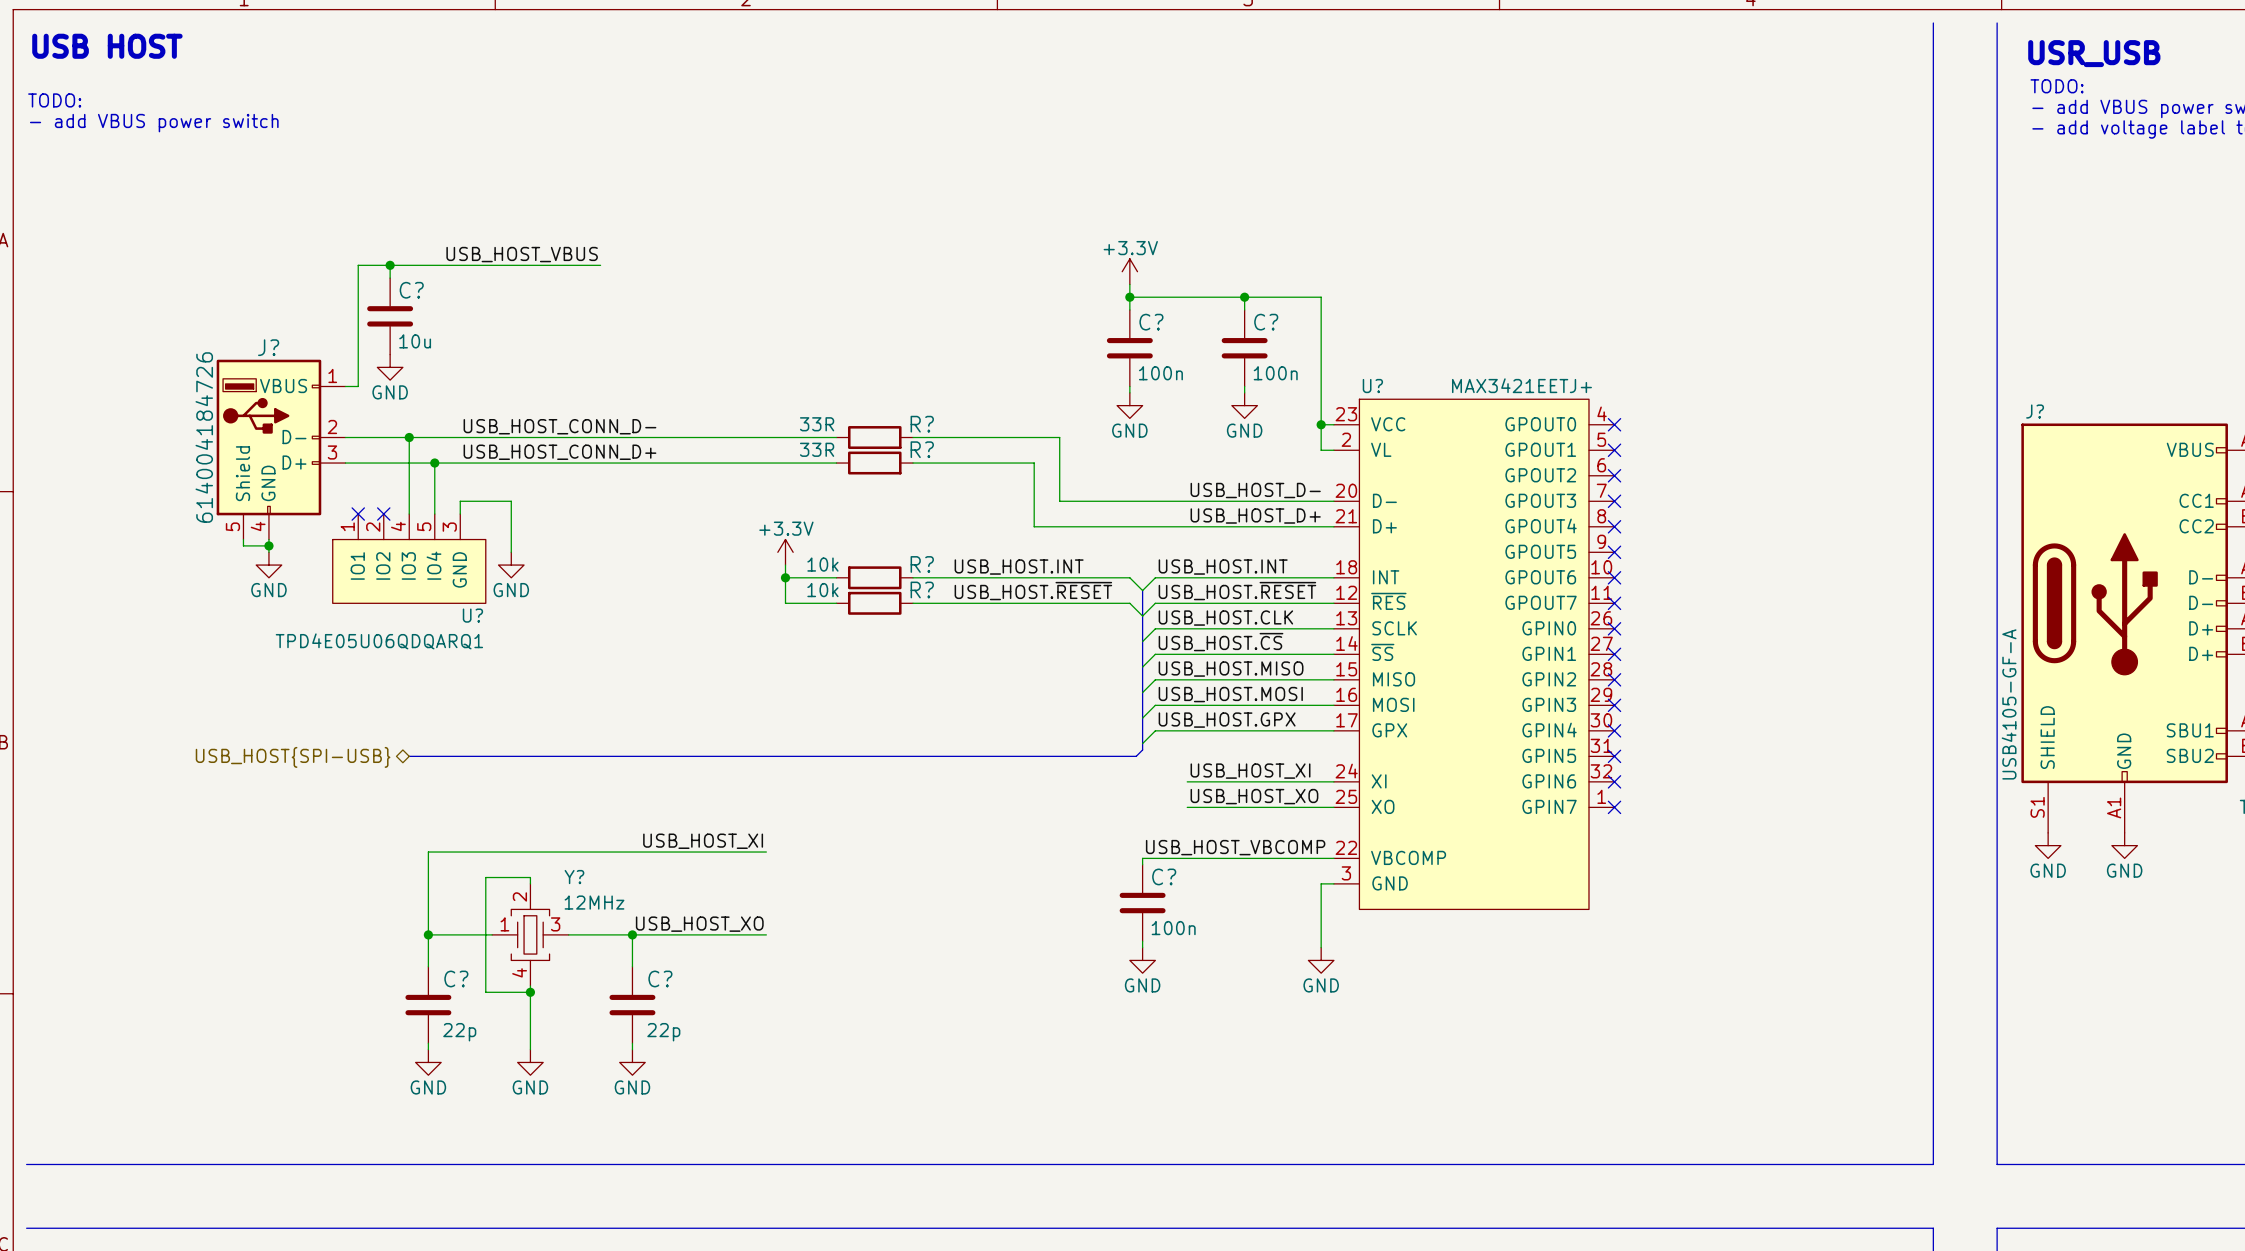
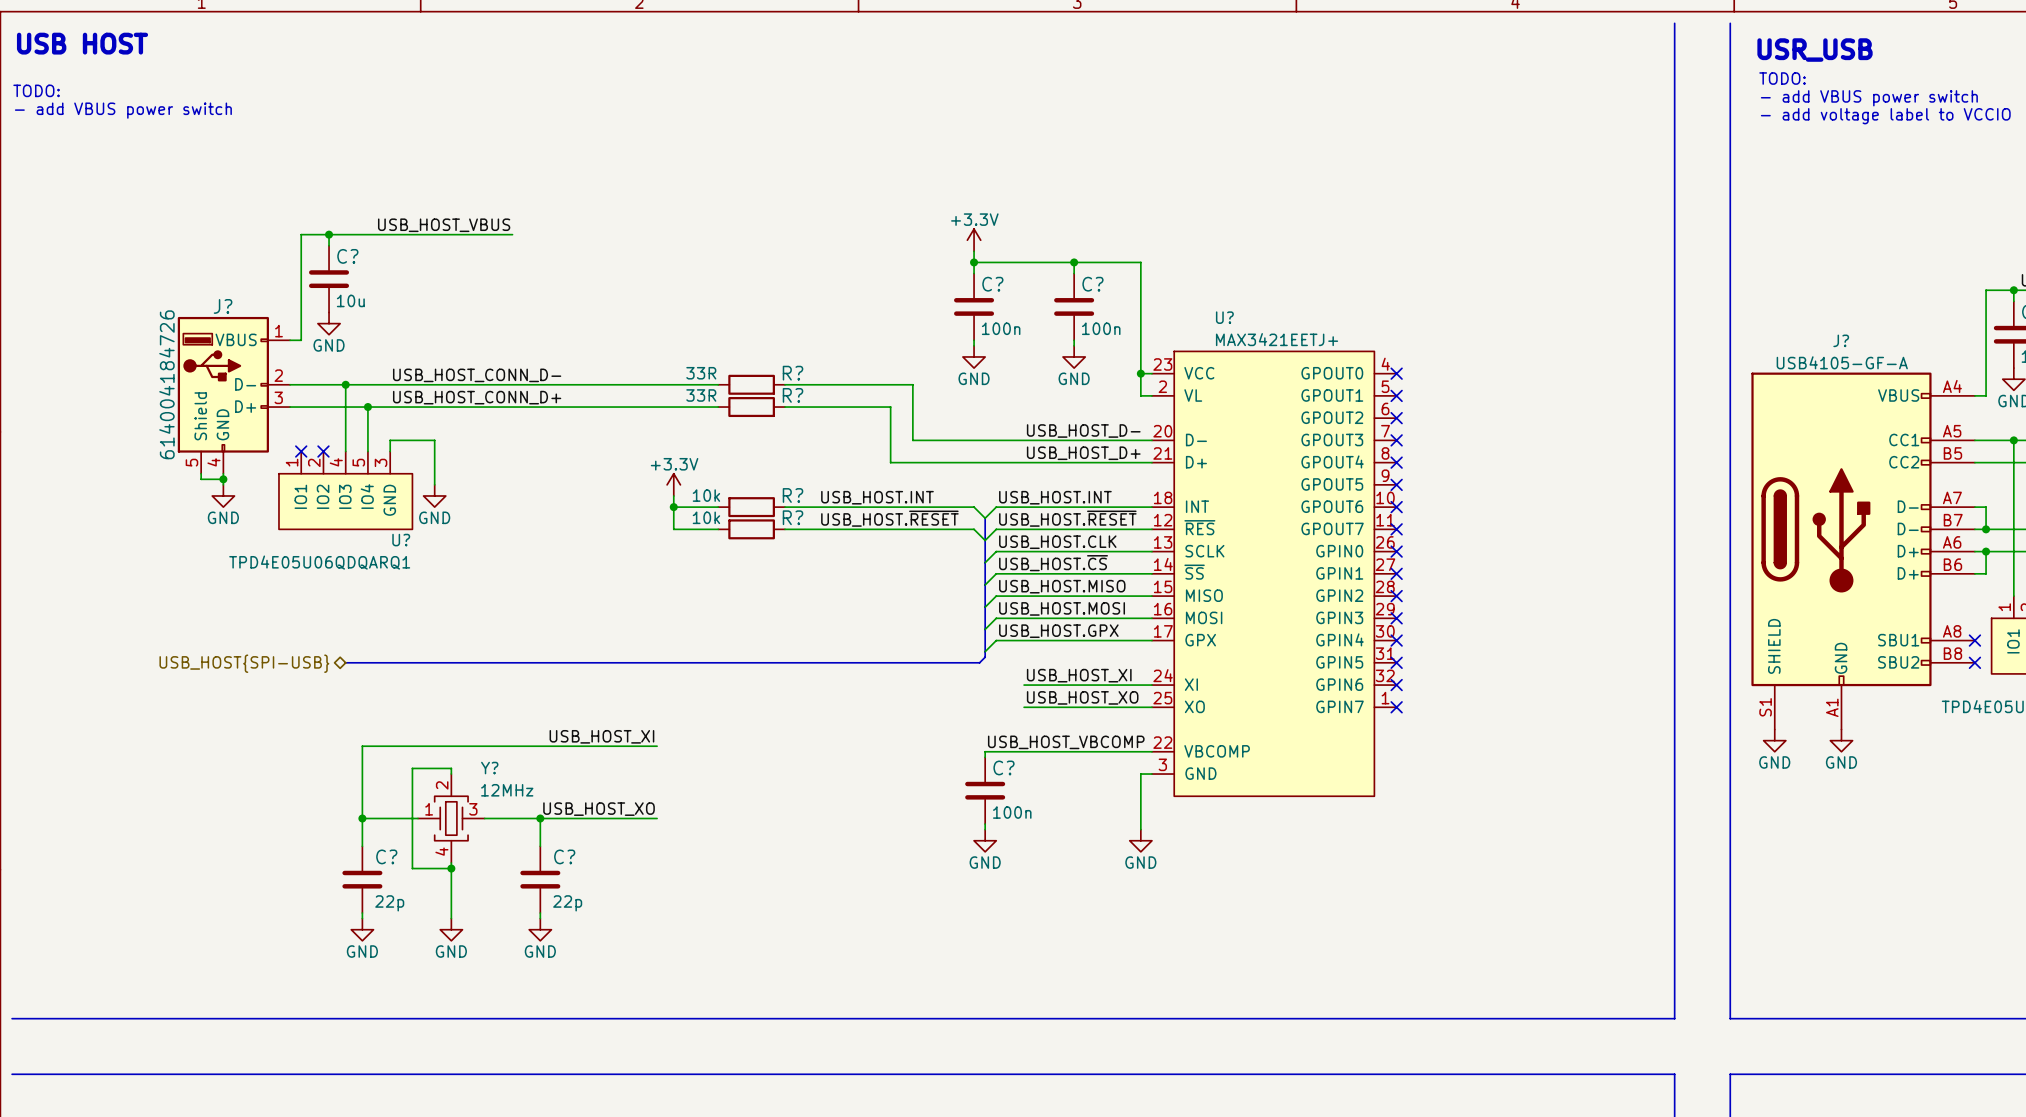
U? value position: MAX3421EETJ+ (1521, 385) -> MAX3421EETJ+ (1277, 339)
U? name position: U? (1372, 386) -> U? (1224, 317)
J? name position: J? (2035, 411) -> J? (1841, 340)
J? value rotation: 0° (2009, 704) -> 90° clockwise (1842, 362)
J? value position: USB4105-GF-A (2009, 704) -> USB4105-GF-A (1842, 362)

